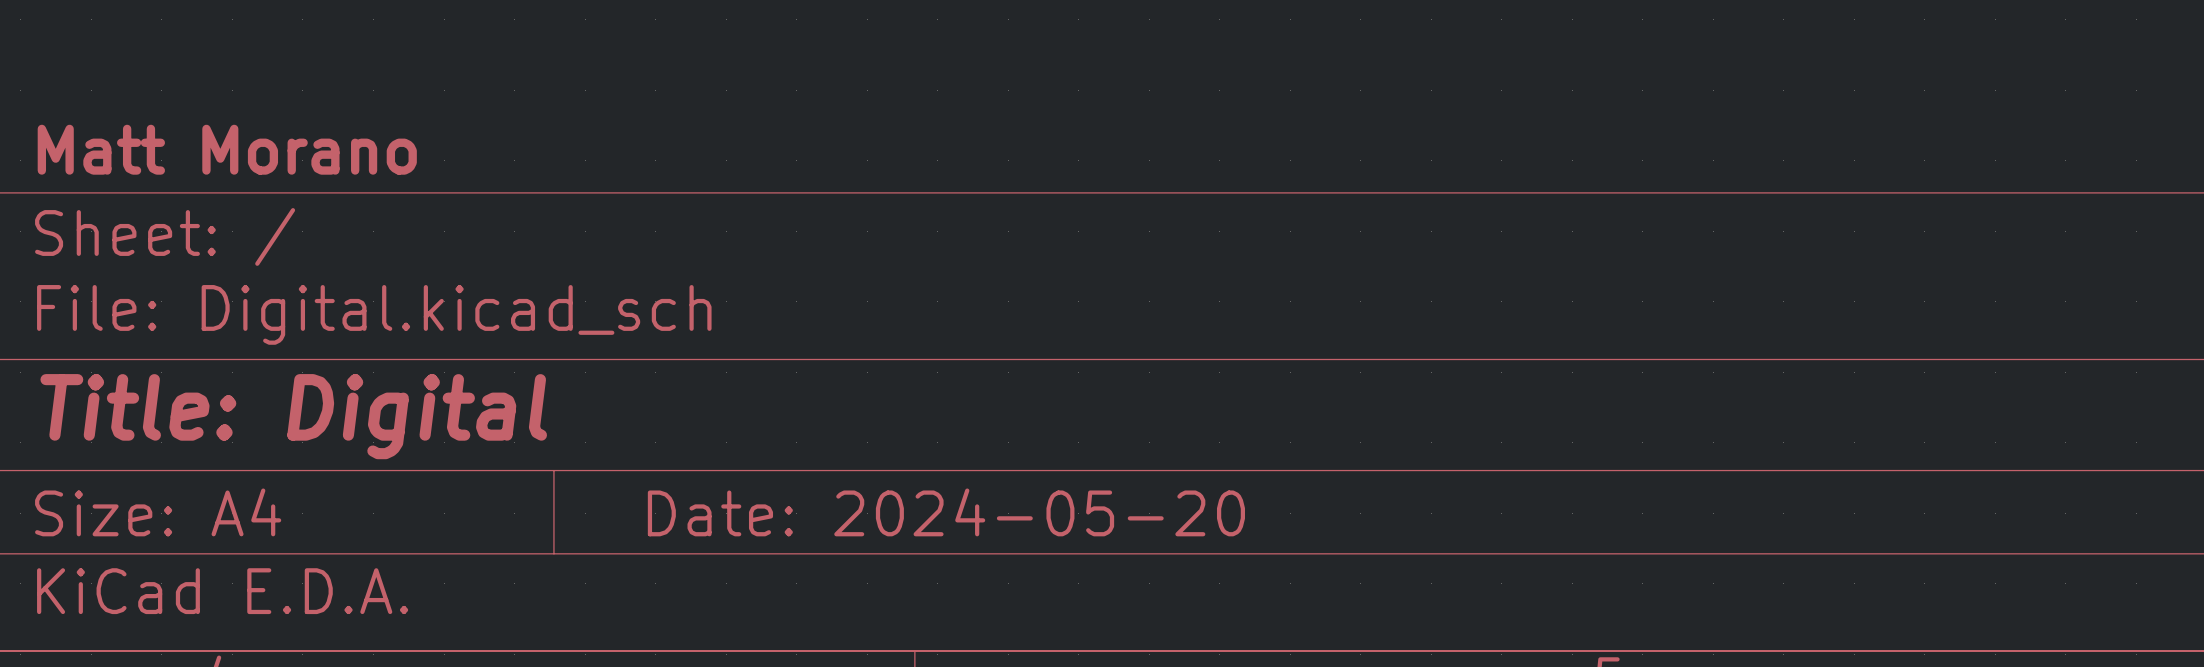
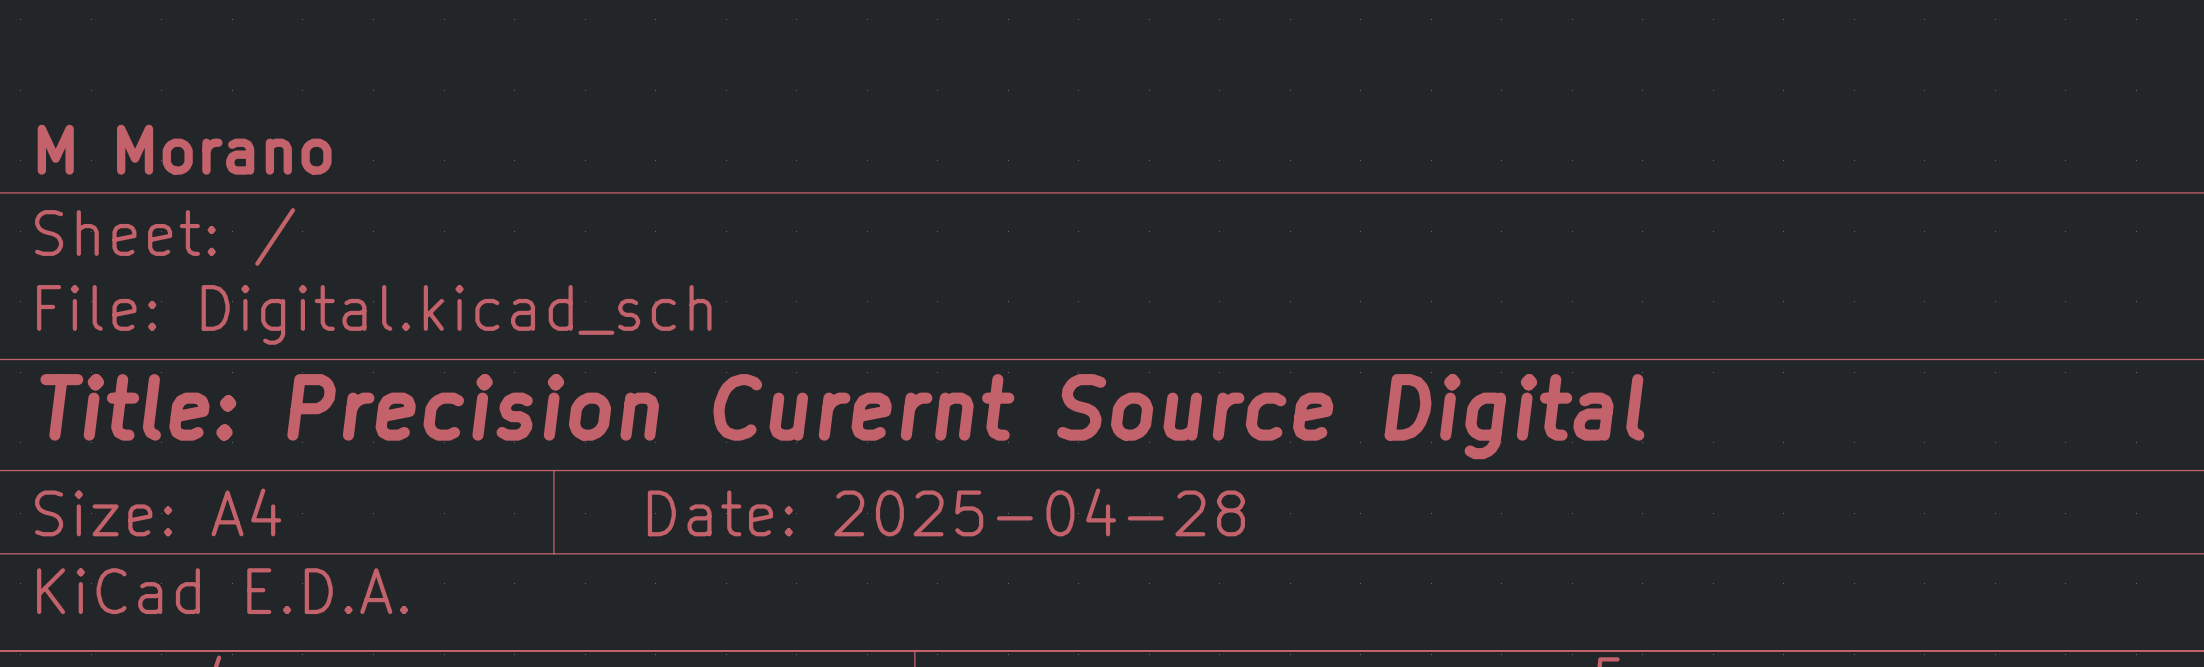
title block: Matt Morano (227, 149) -> M Morano (184, 149)
title block: Title: Digital (293, 416) -> Title: Precision Curernt Source Digital (842, 416)
title block: Date: 2024-05-20 (946, 512) -> Date: 2025-04-28 (946, 512)

